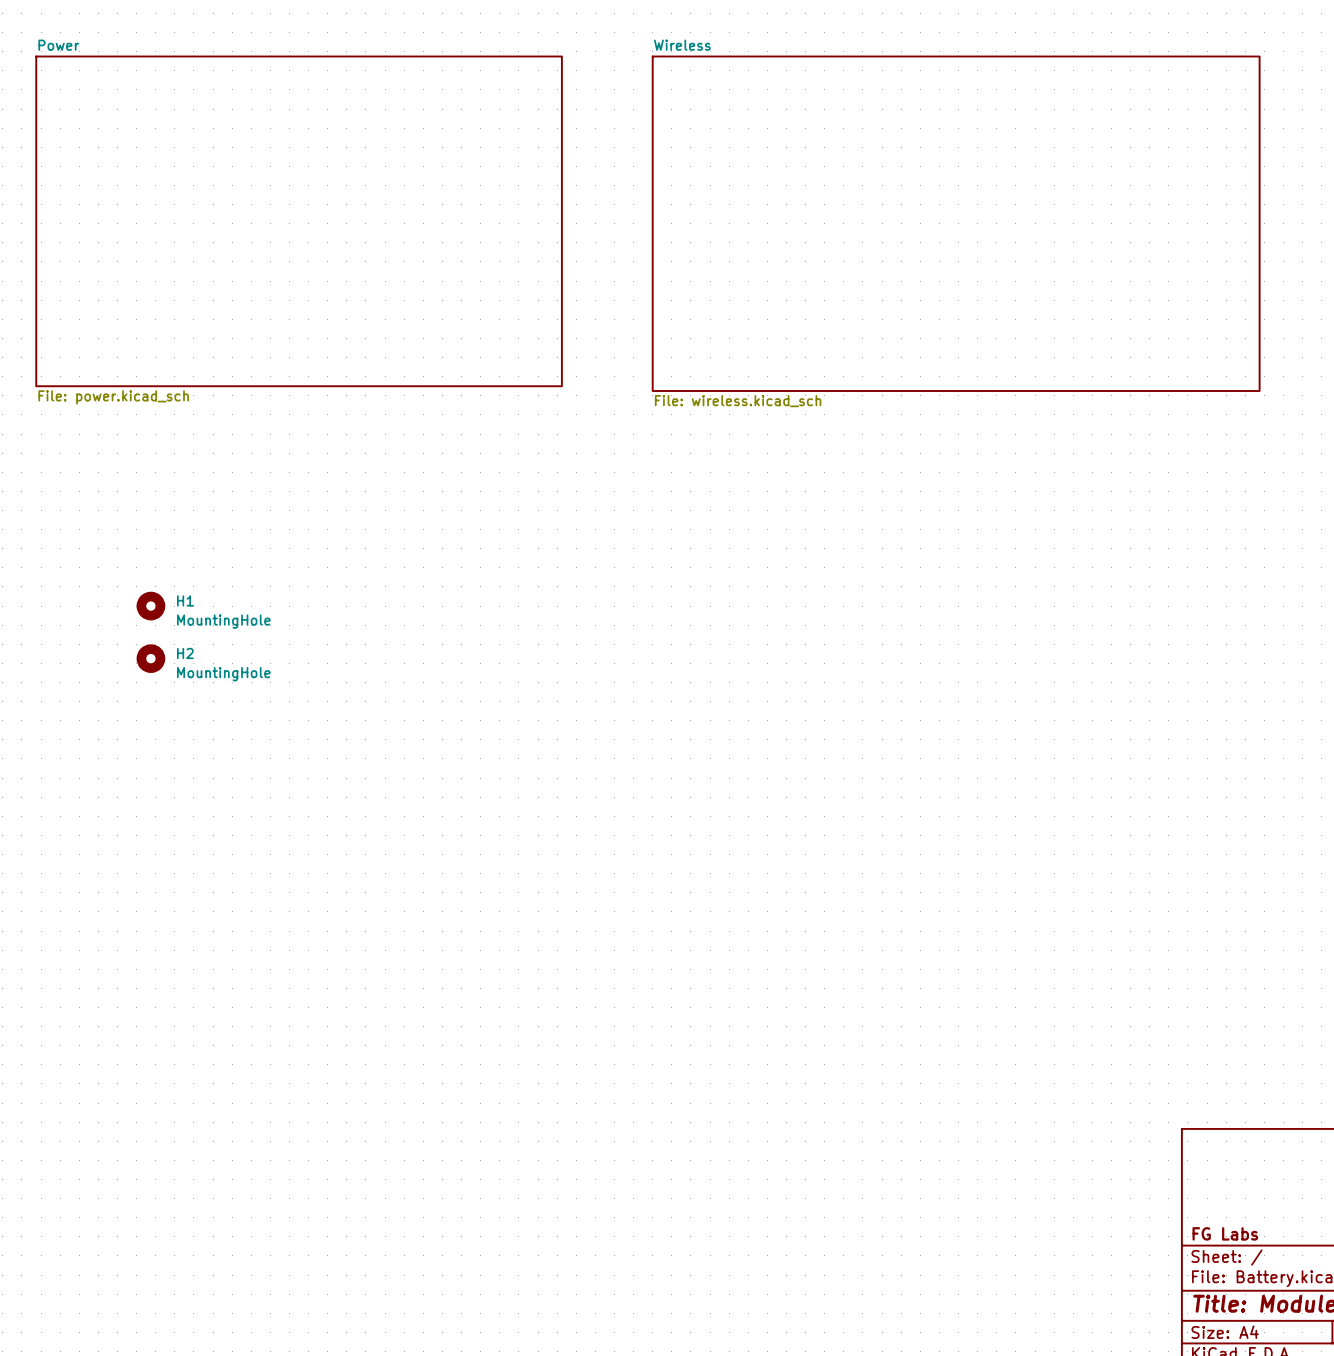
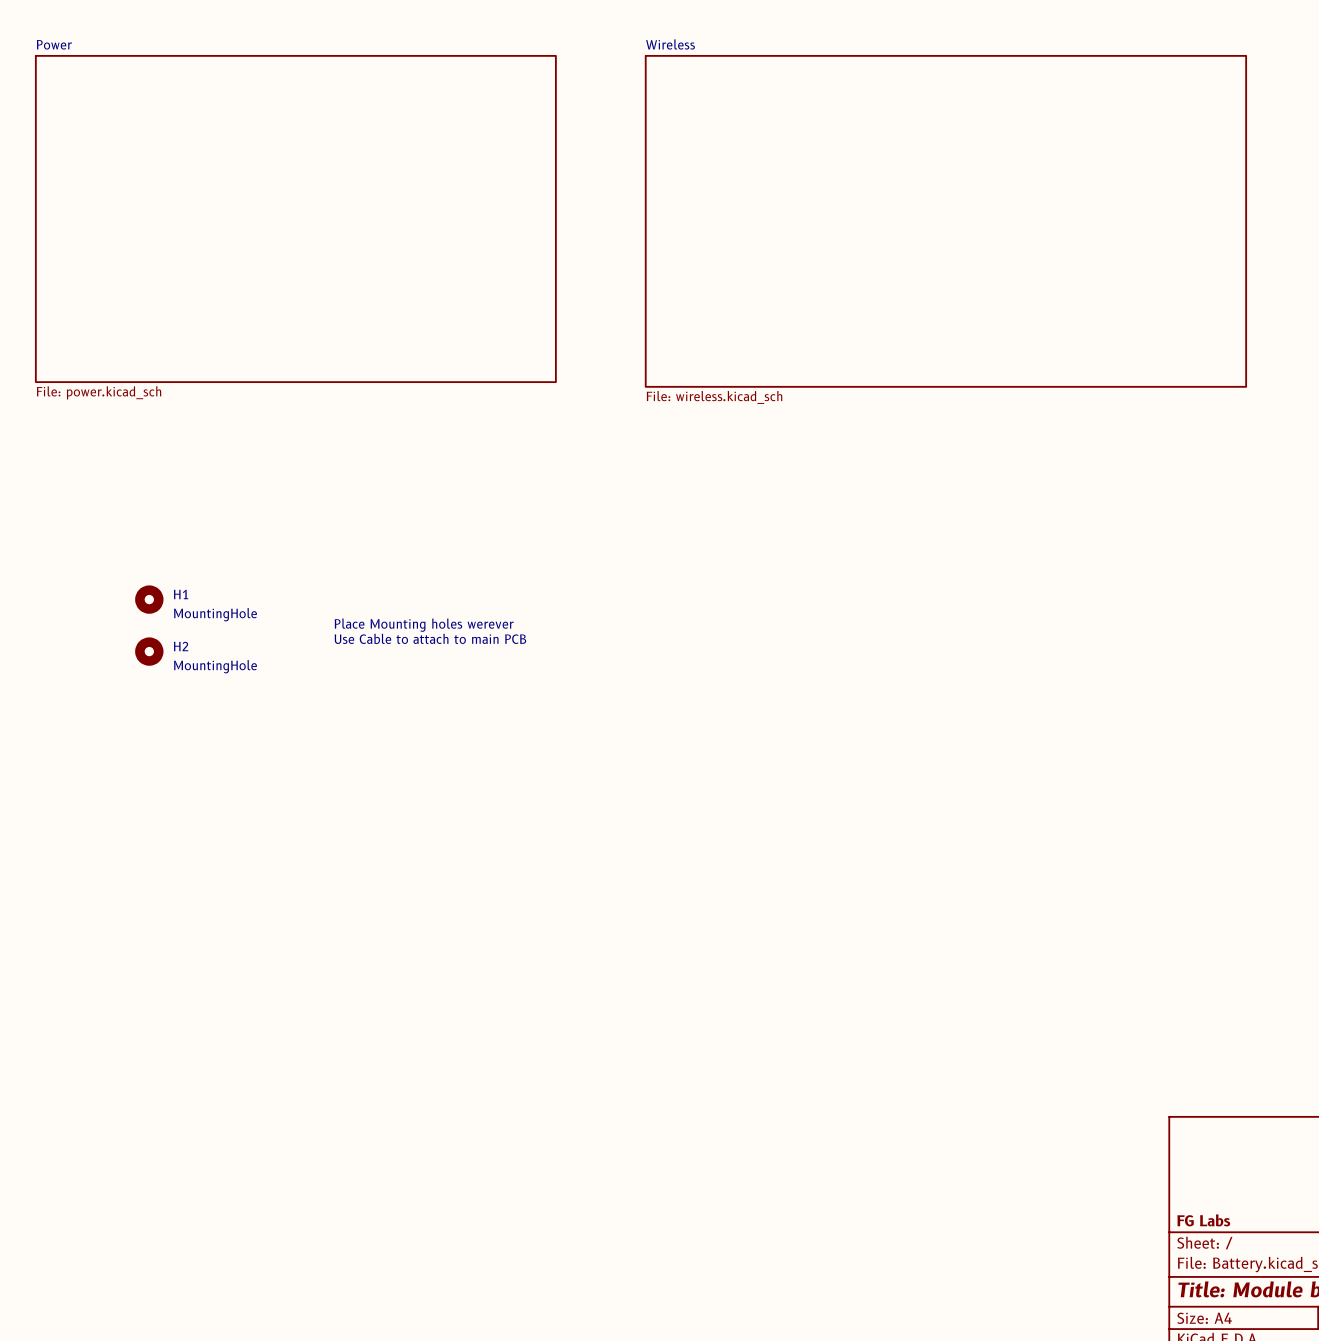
text: none -> Place Mounting holes werever (424, 625)
text: none -> Use Cable to attach to main PCB (430, 638)

